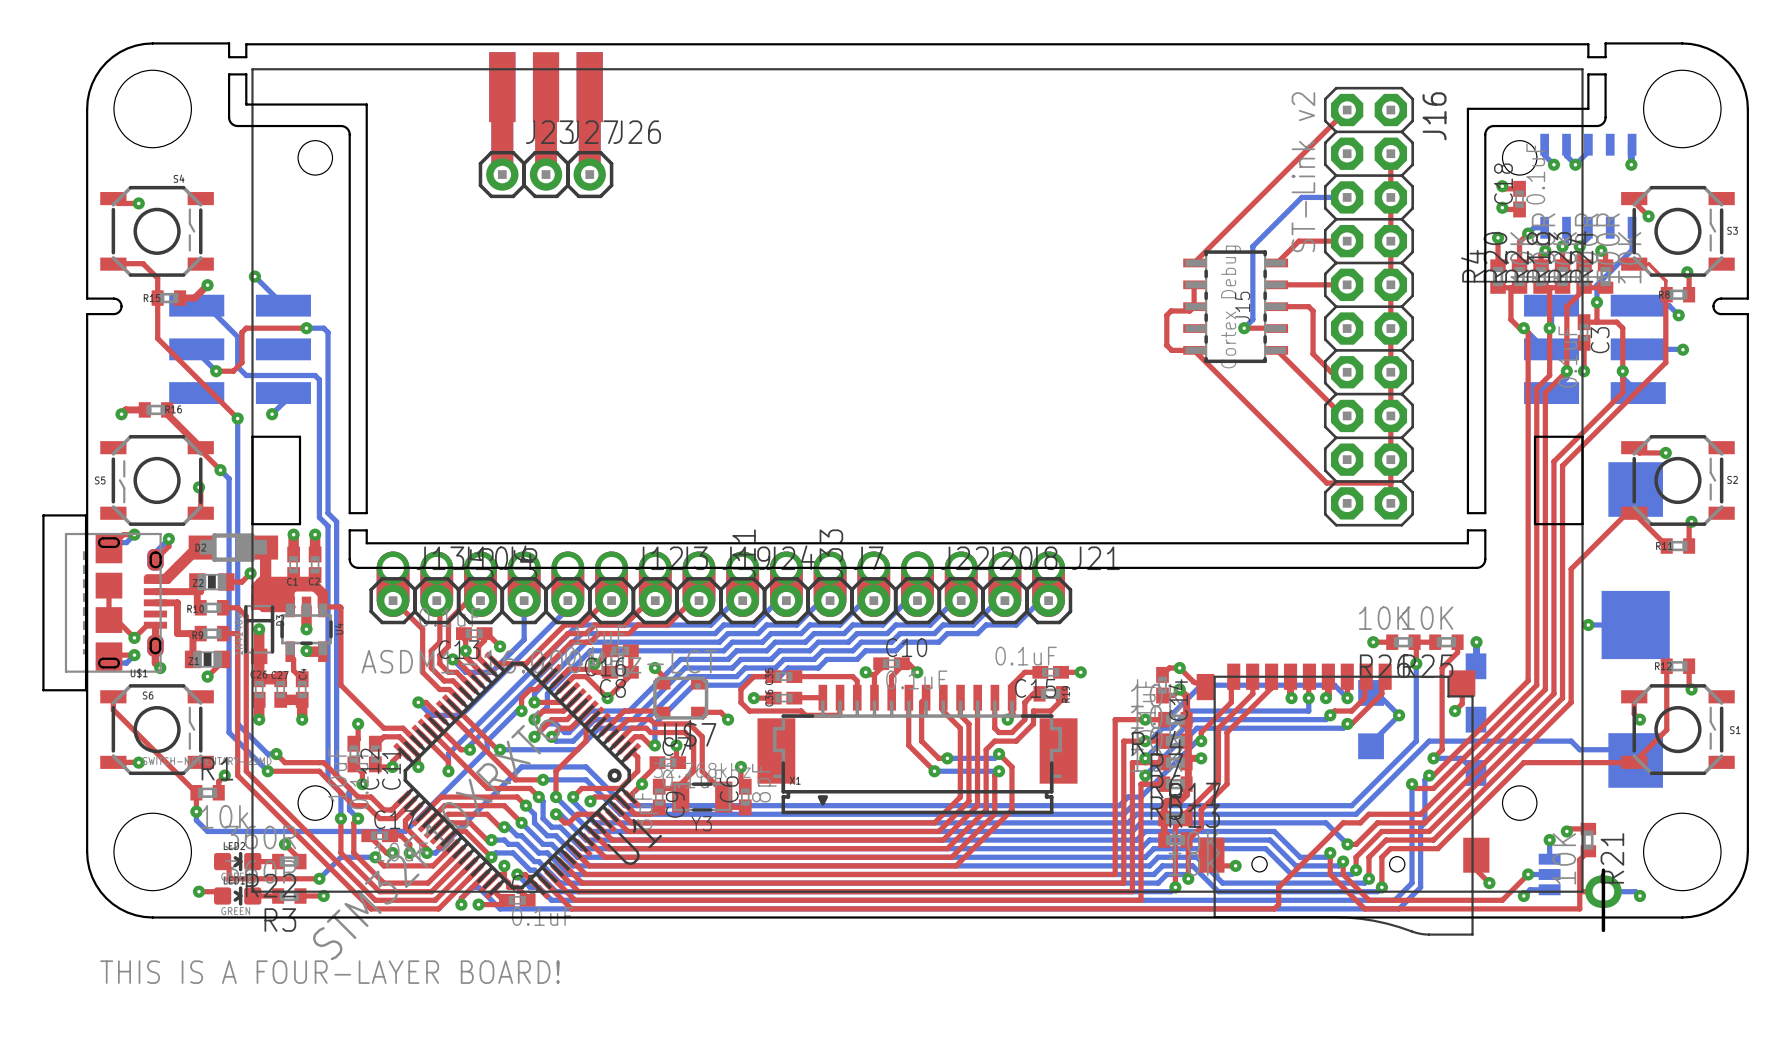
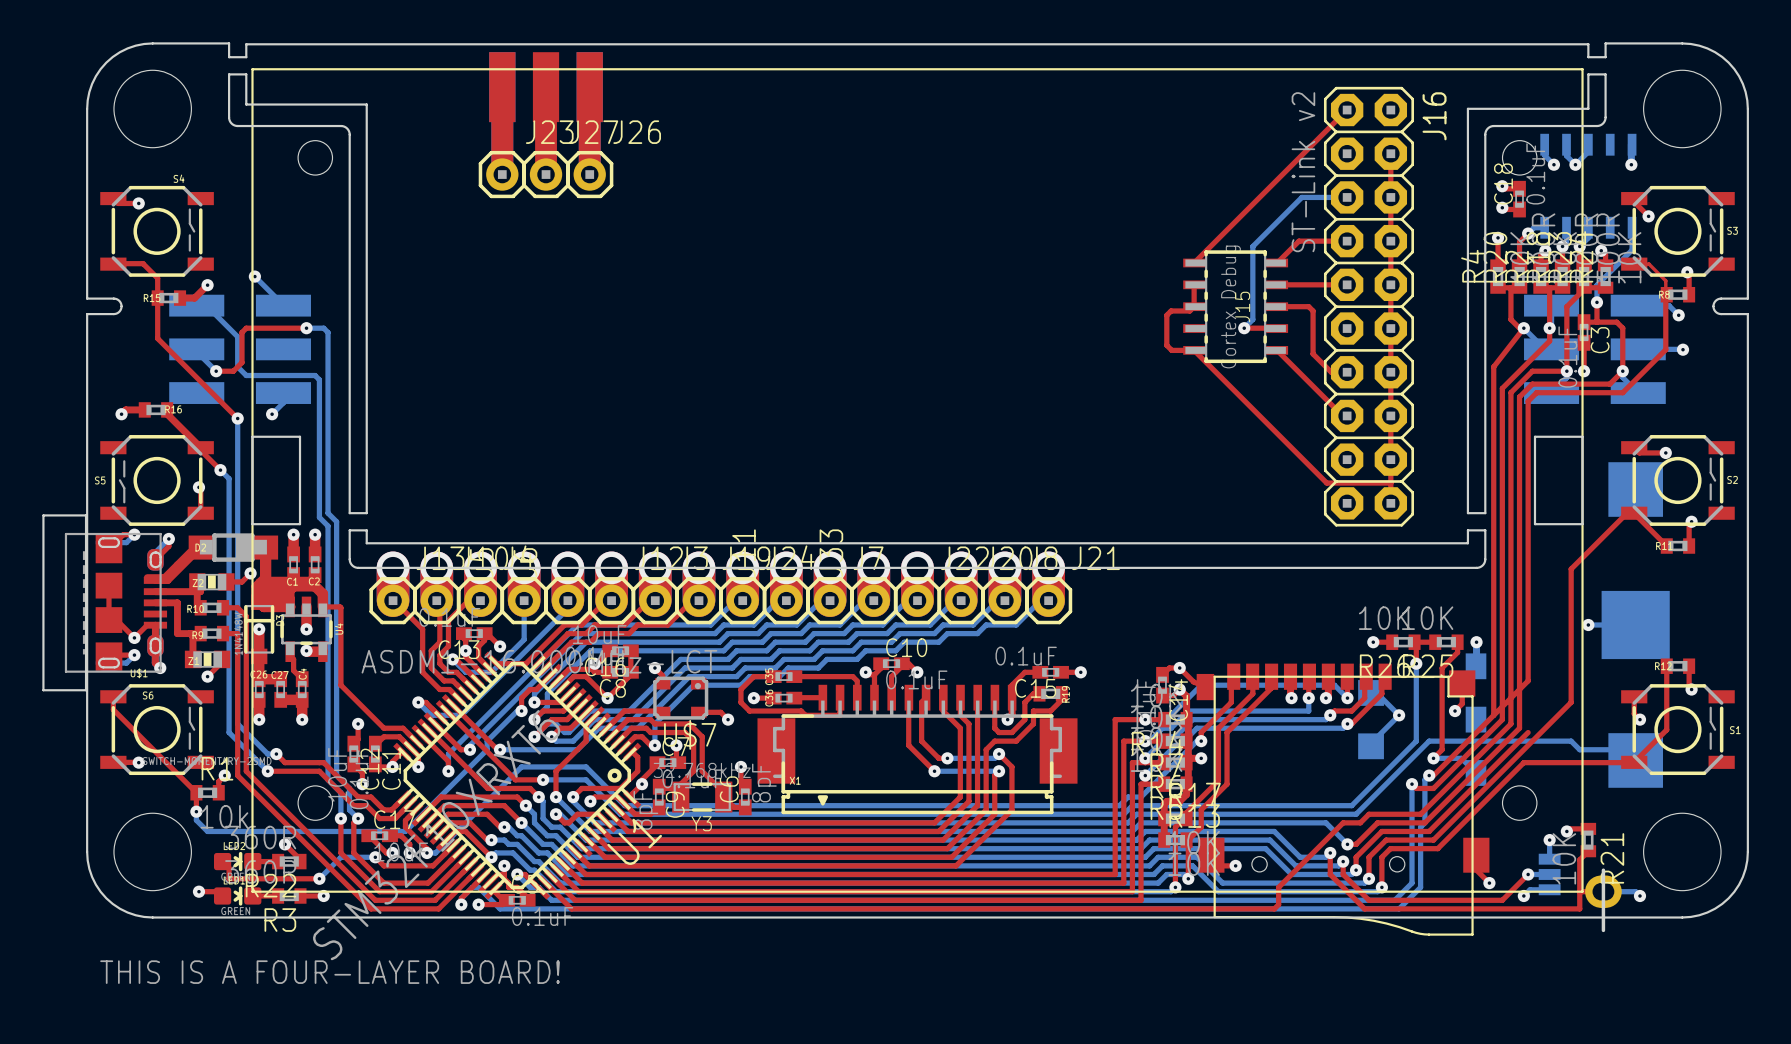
top track: (1523, 328) (1528, 332) (1528, 401) -> (1665, 349) (1622, 392) (1536, 392) (1528, 401)
top track: none -> (1523, 328) (1493, 366) (1493, 715)
top track: (1549, 341) (1549, 375) (1536, 388) (1536, 685) (1502, 719) -> (1549, 341) (1502, 388) (1502, 719)
top track: (1665, 349) (1665, 362) (1562, 465) (1562, 698) (1528, 732) -> none
top track: (1566, 371) (1545, 392) (1545, 689) (1510, 723) -> (1566, 371) (1532, 371) (1510, 392) (1510, 723)
top track: (1622, 371) (1622, 392) (1553, 461) (1553, 693) (1519, 728) -> (1622, 371) (1609, 384) (1532, 384) (1519, 397) (1519, 728)

